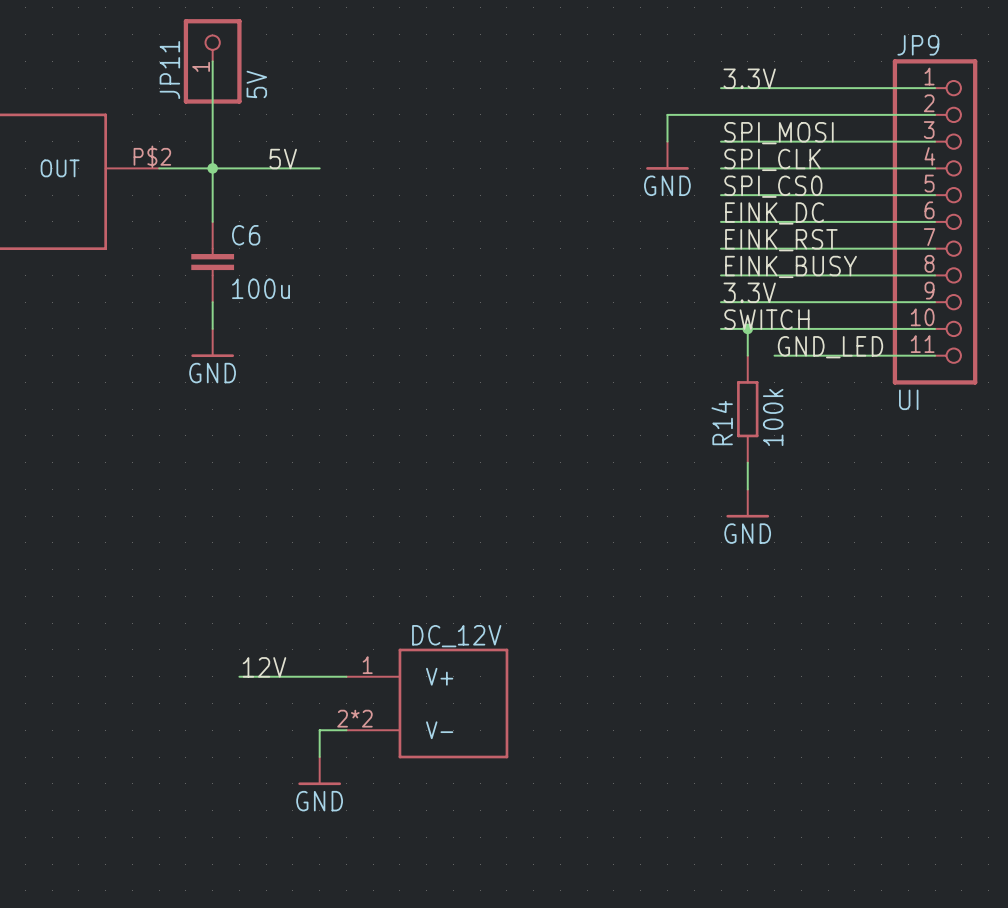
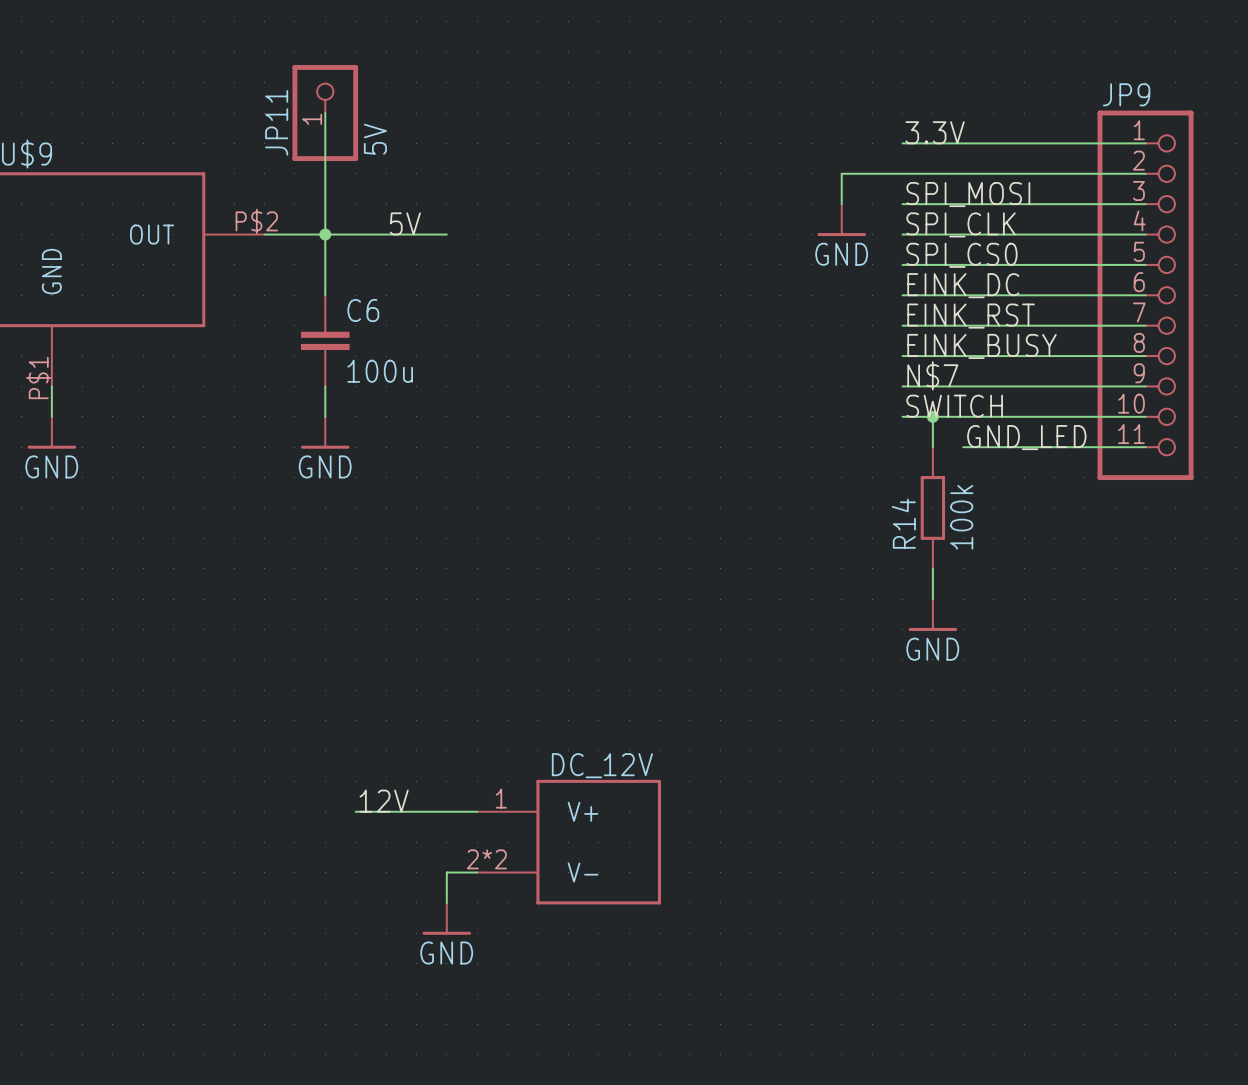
label: 3.3V (749, 292) -> N$7 (932, 375)
JP9 value: UI (908, 399) -> none

